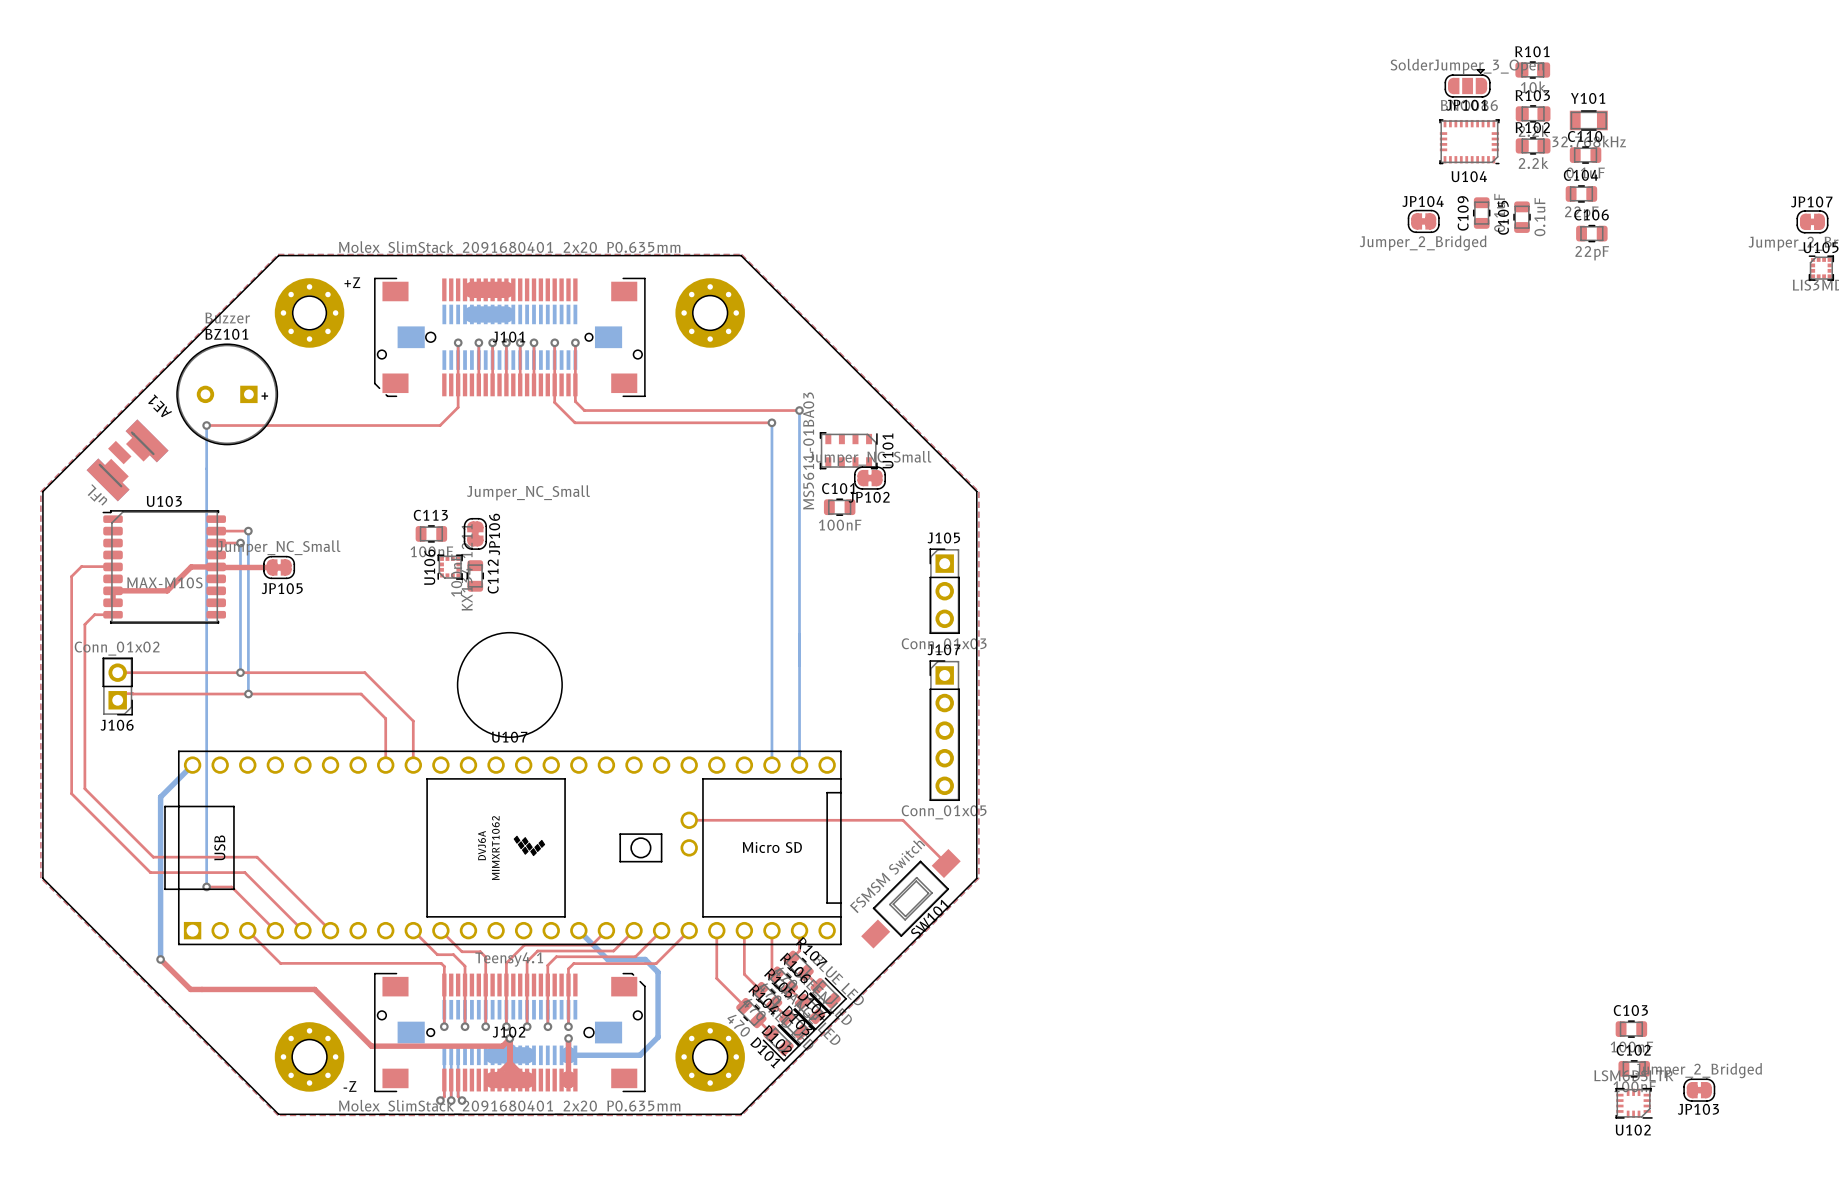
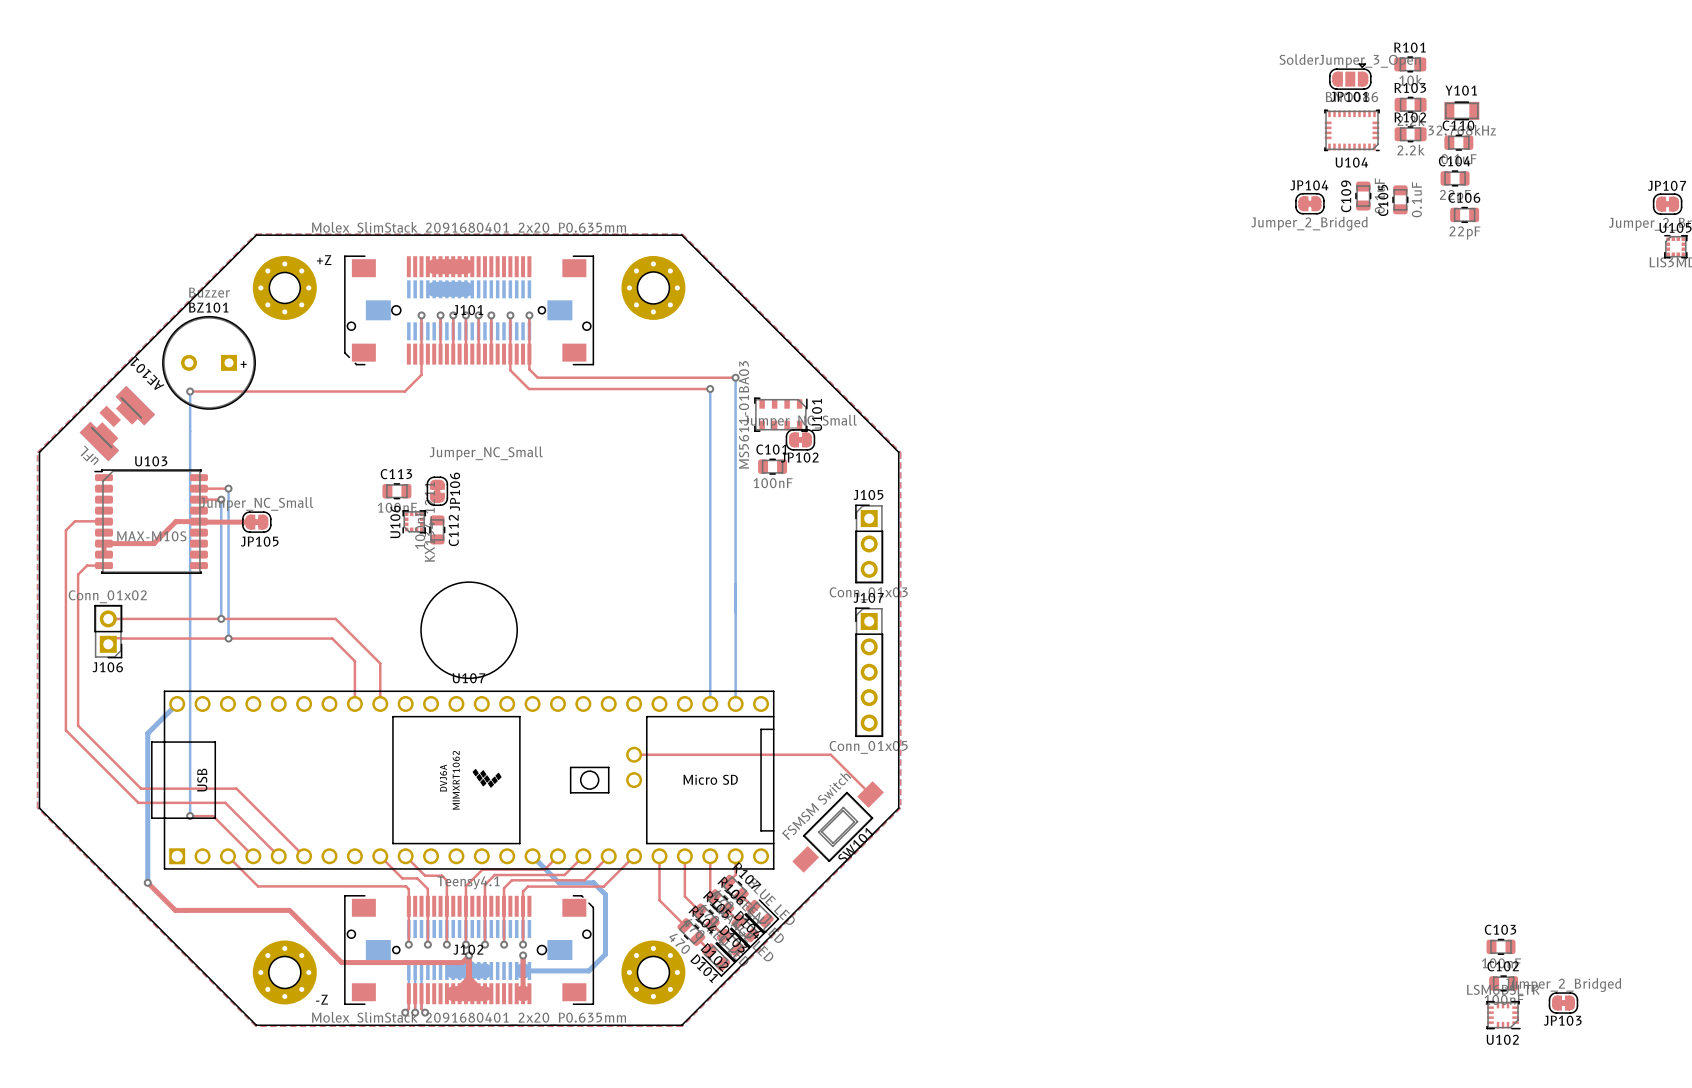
AE1 name: AE1 (160, 405) -> AE101 (147, 373)

